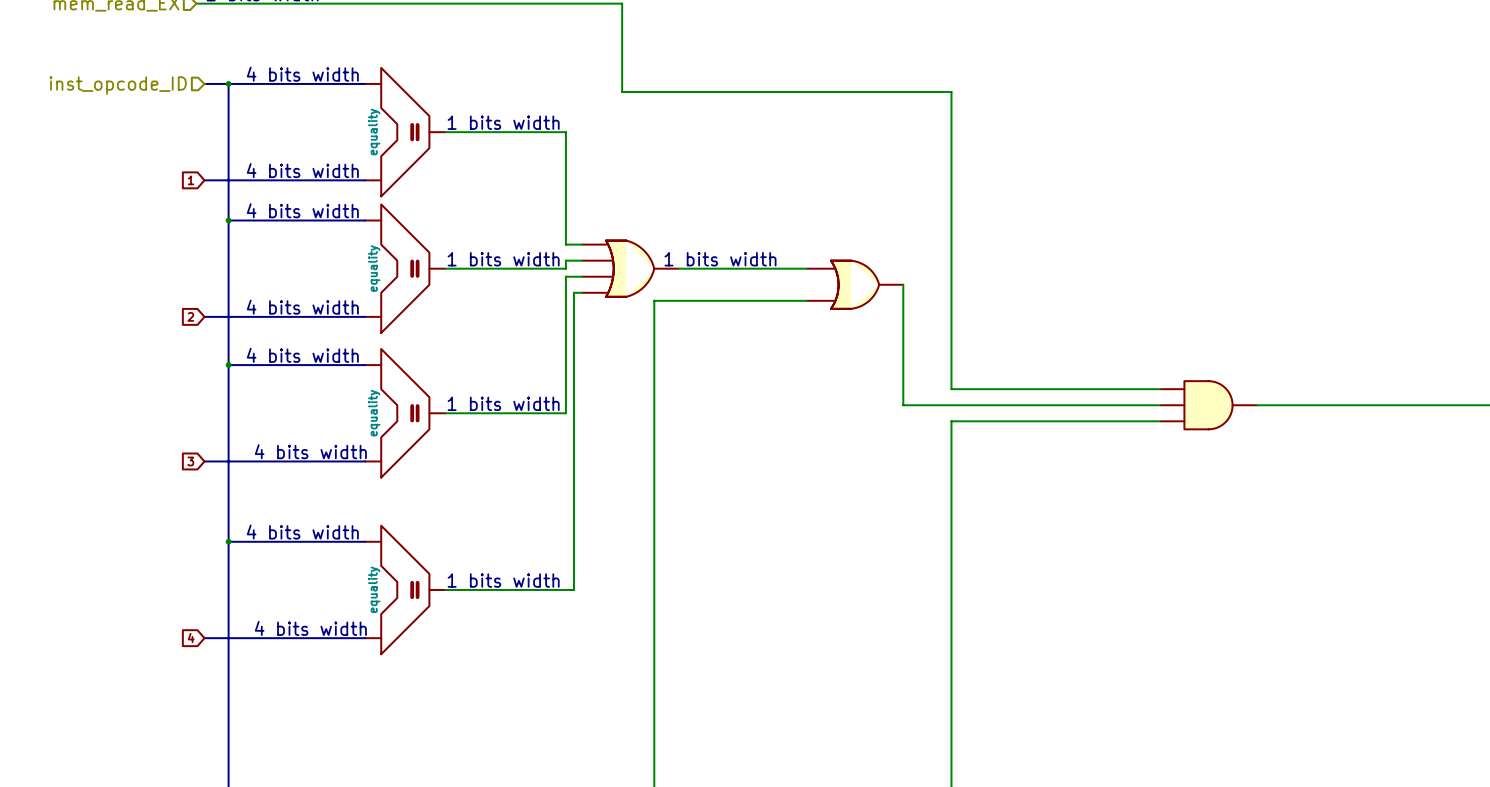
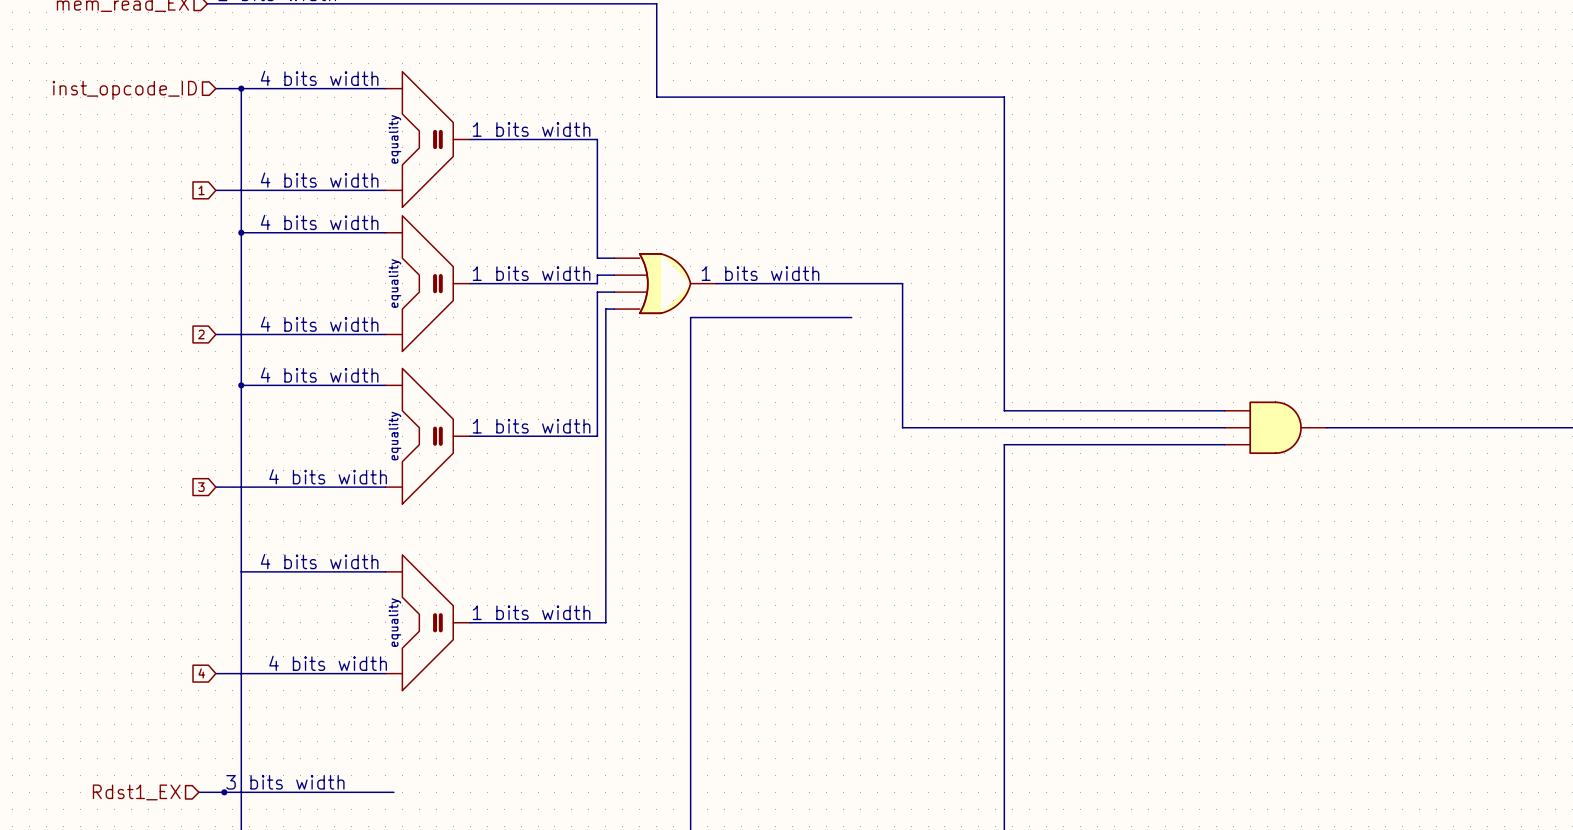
part: (855, 284) -> none
wire: (903, 284) (903, 405) -> (851, 283) (902, 283) (902, 427) (953, 427)
junction: (228, 541) -> none
text: none -> 3 bits width (285, 782)
hierarchical label: none -> Rdst1_EX (136, 792)
bus: none -> (198, 792) (393, 792)
junction: none -> (224, 792)

